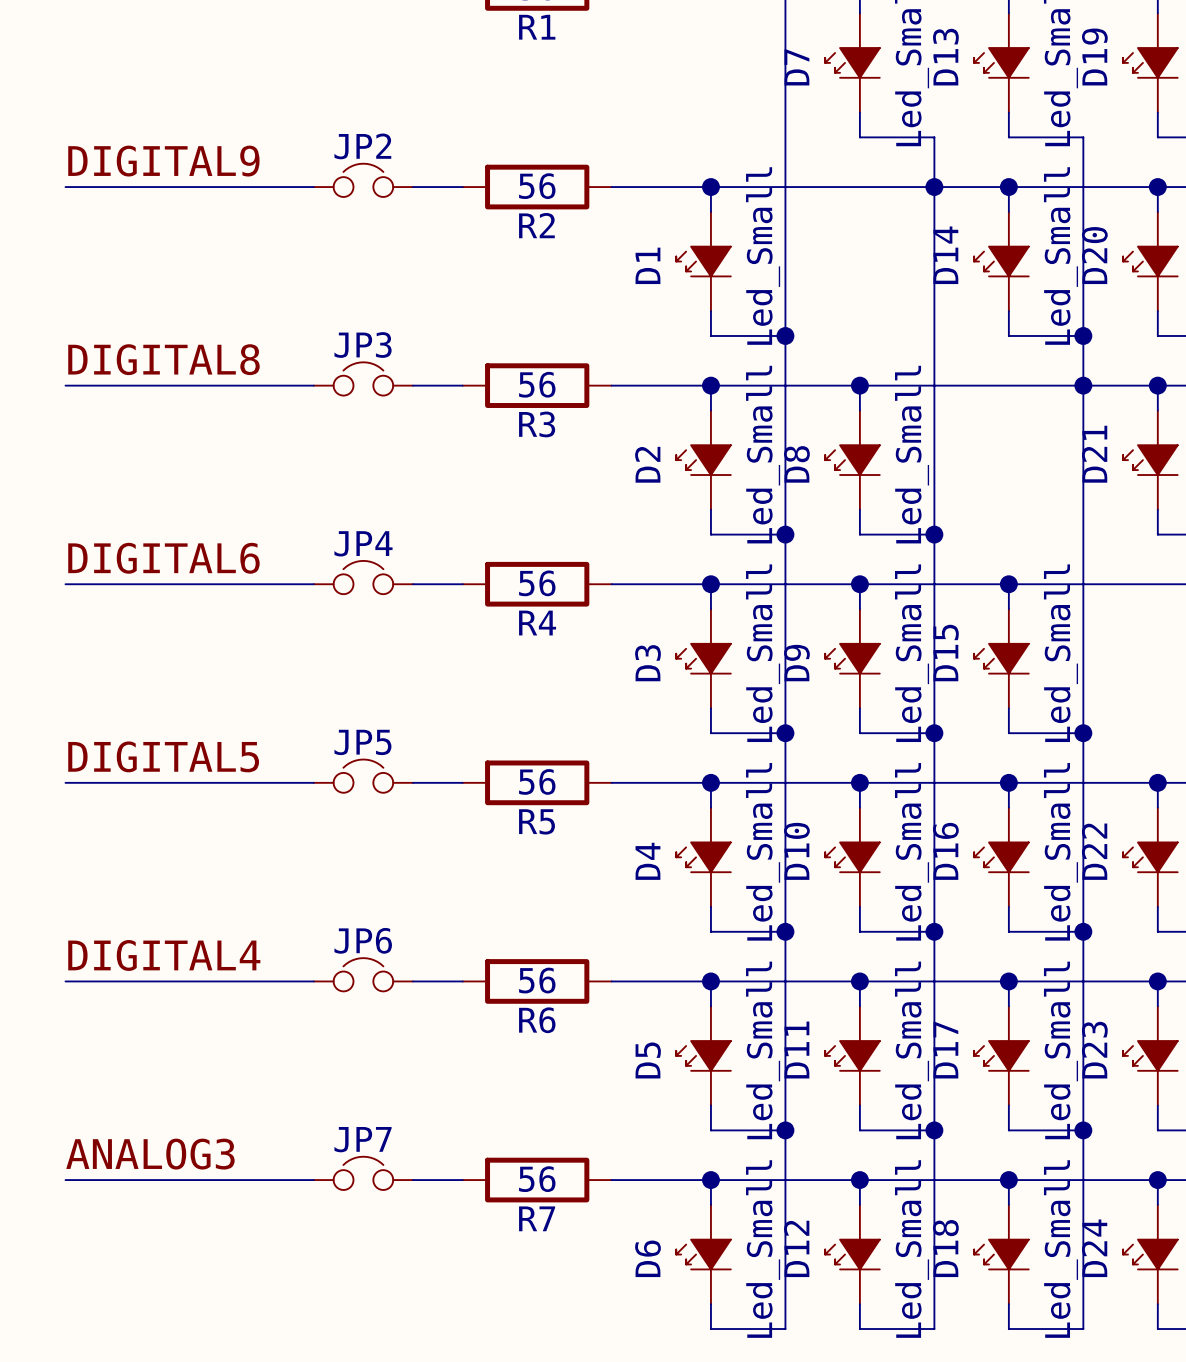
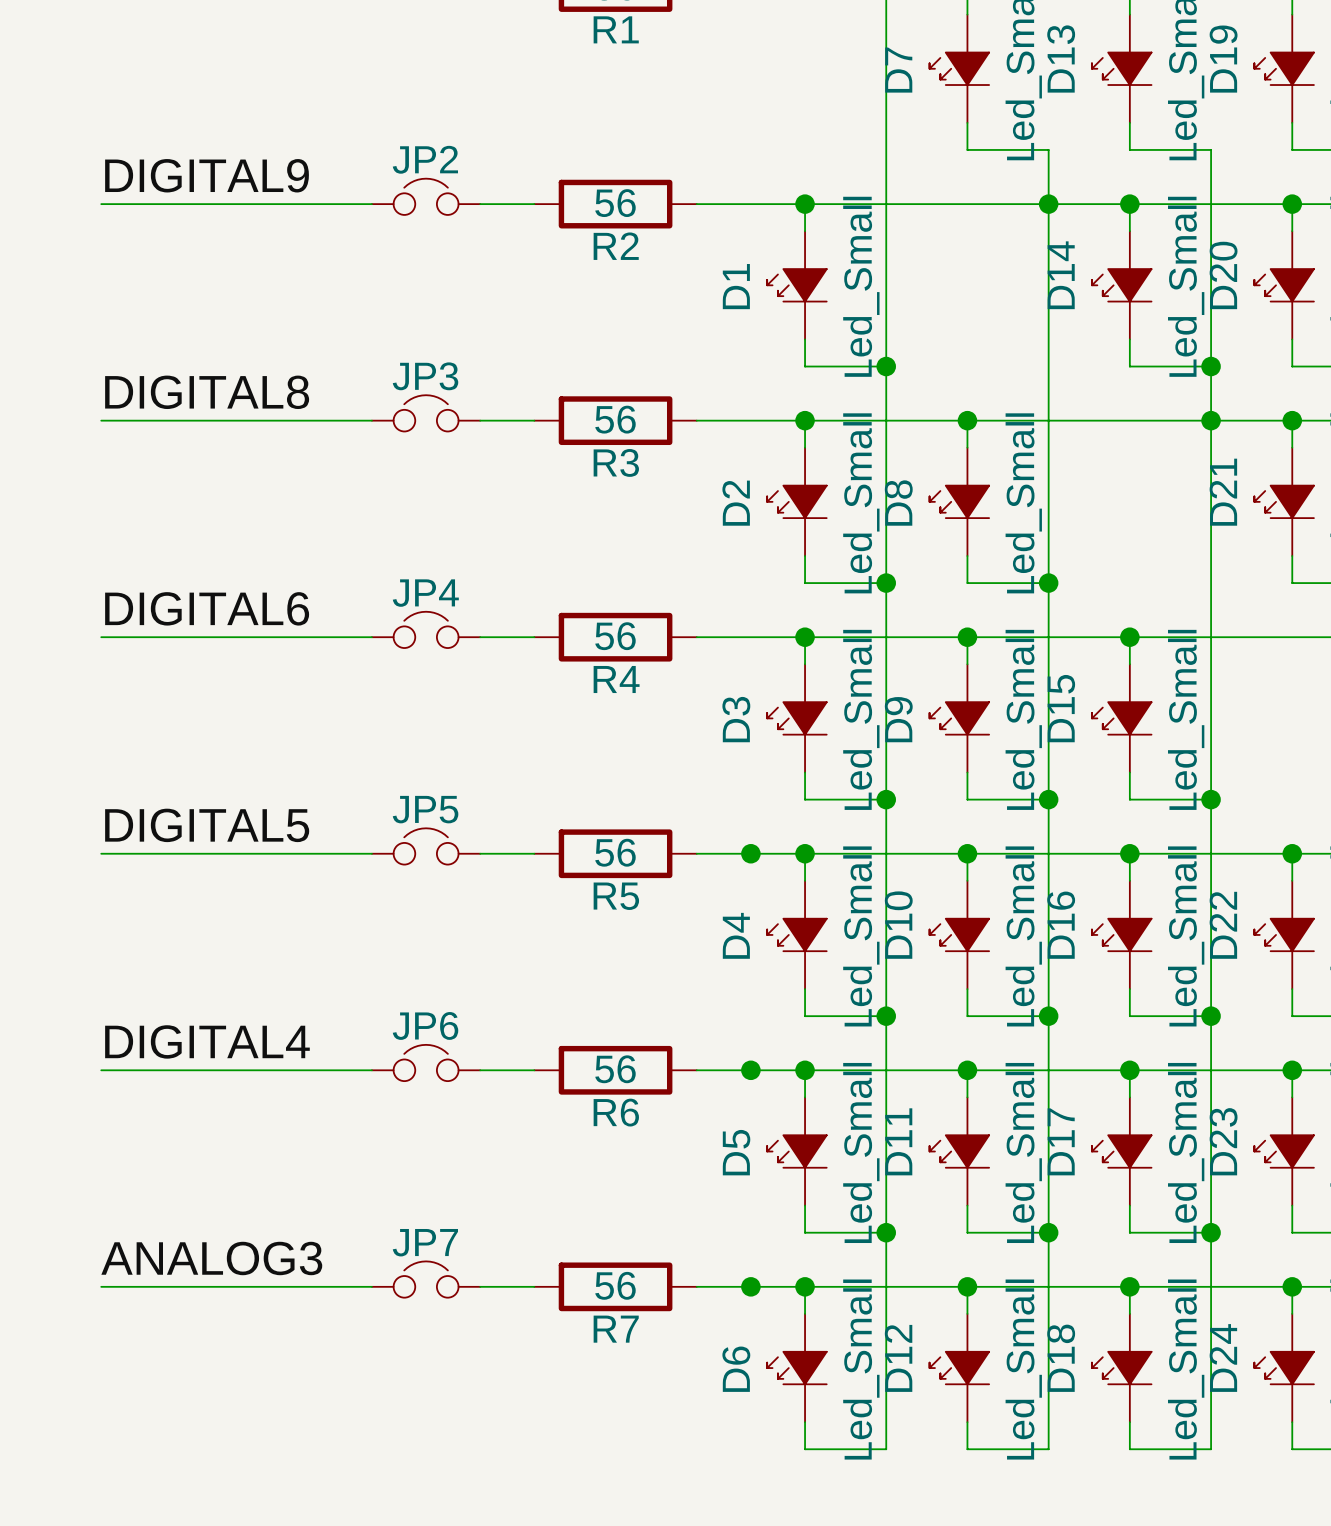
junction: none -> (750, 853)
junction: none -> (750, 1070)
junction: none -> (750, 1286)

